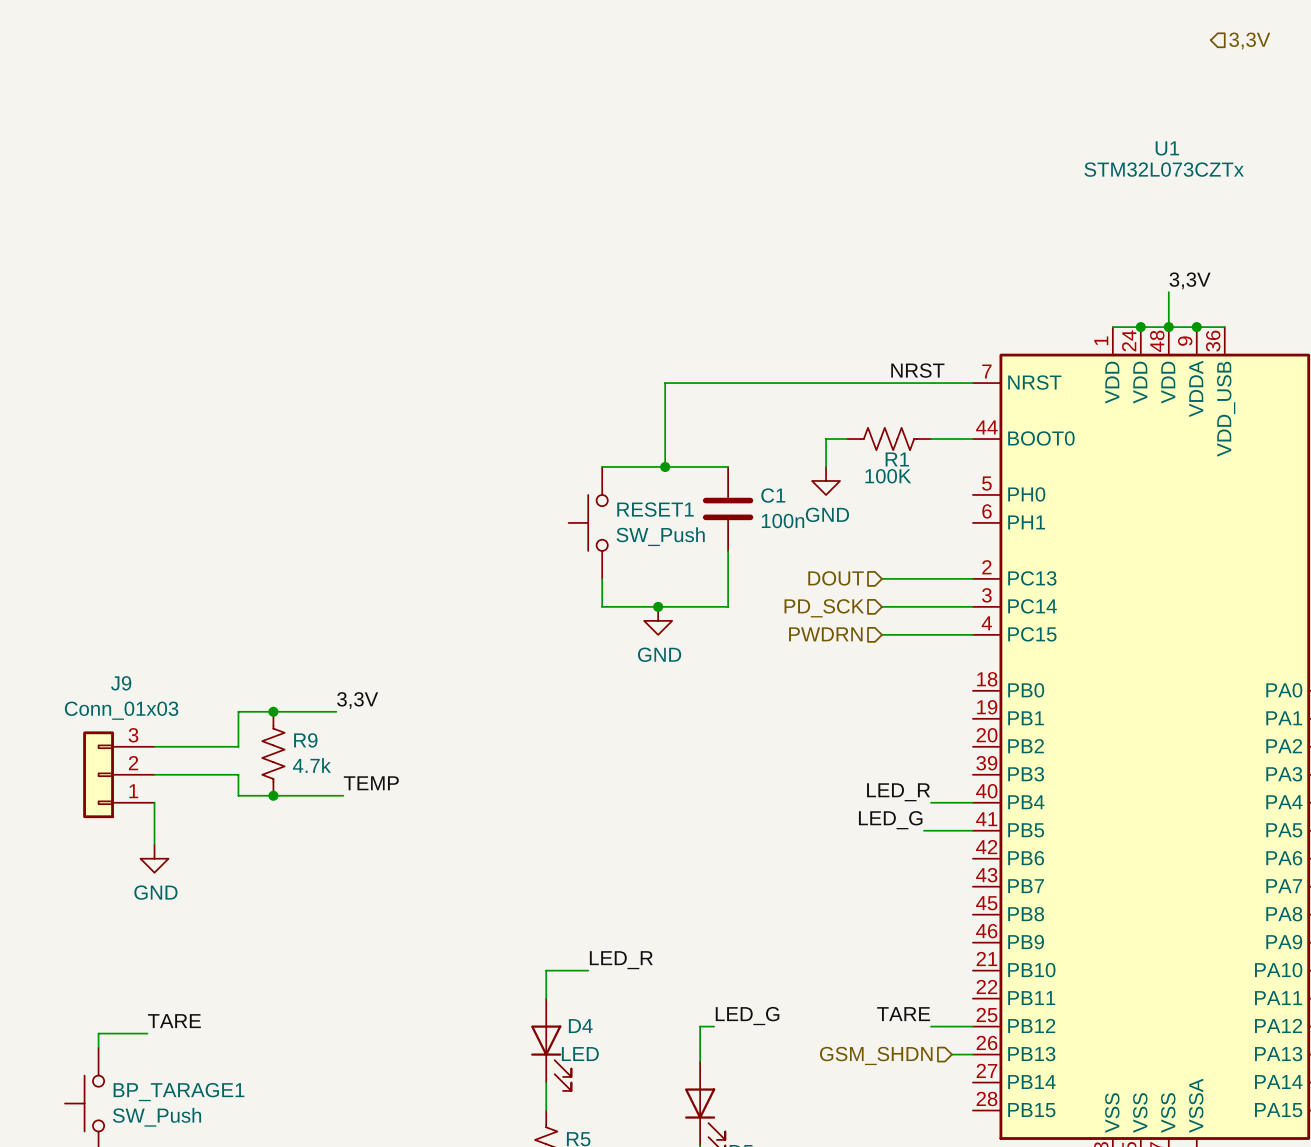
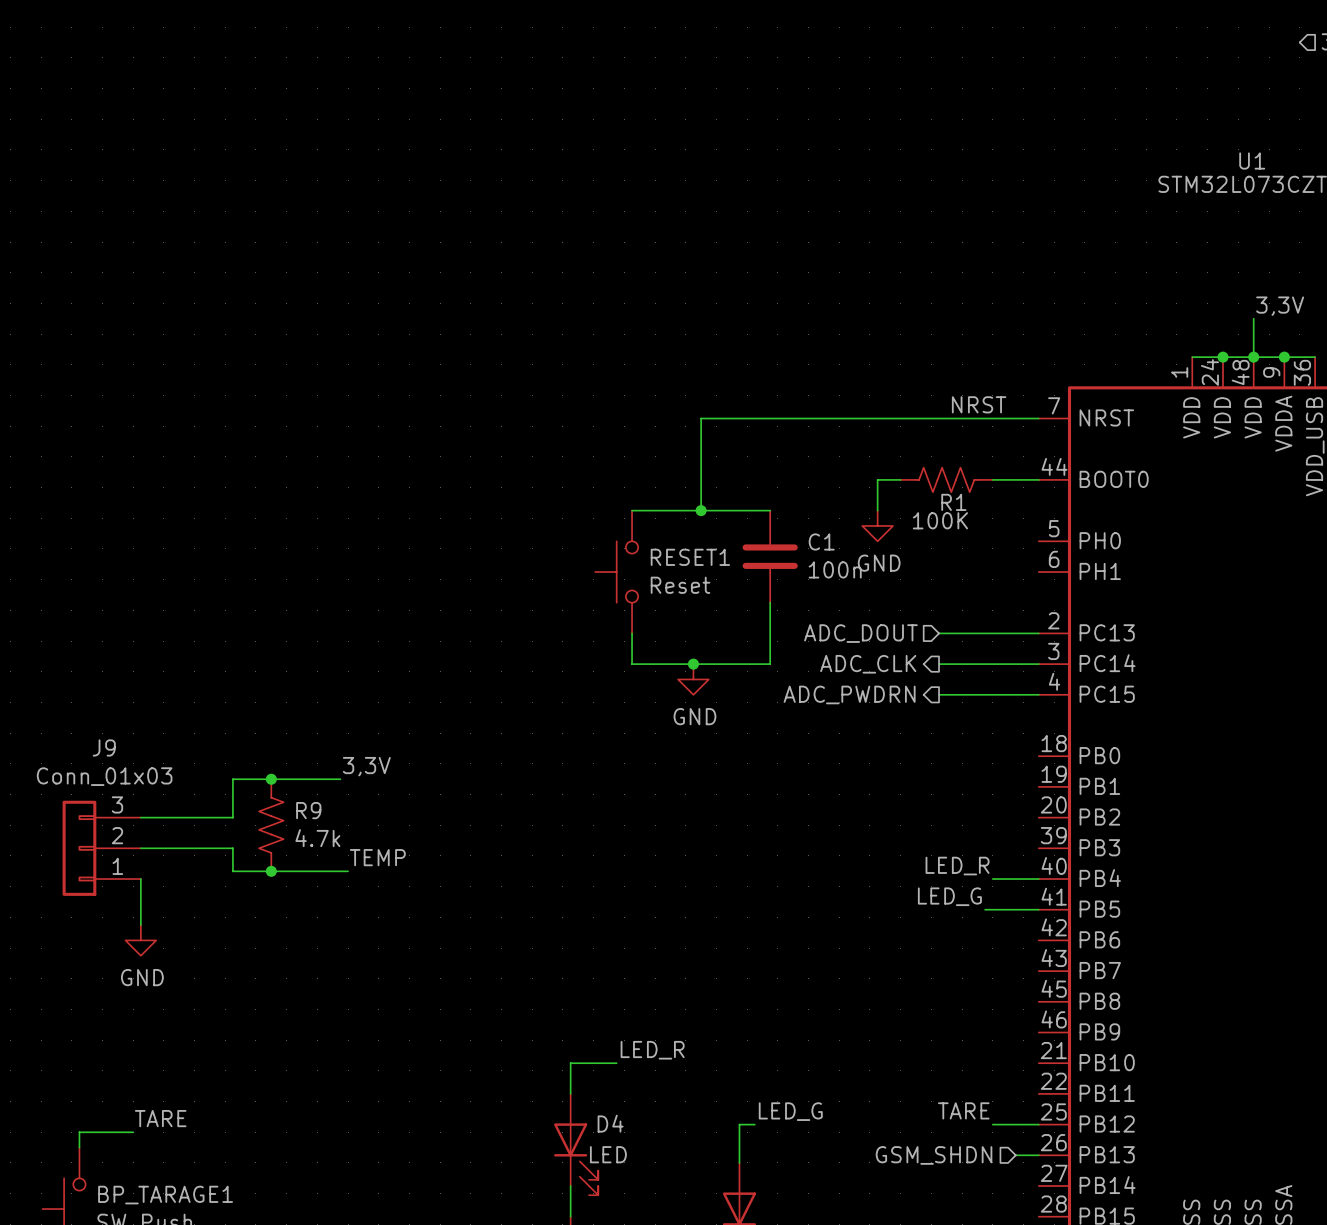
RESET1 value: SW_Push (660, 536) -> Reset (680, 585)
hierarchical label: DOUT (836, 578) -> ADC_DOUT (860, 633)
hierarchical label shape: input (824, 608) -> output (868, 664)
hierarchical label: PD_SCK (824, 608) -> ADC_CLK (868, 664)
hierarchical label shape: input (825, 634) -> output (849, 694)
hierarchical label: PWDRN (825, 634) -> ADC_PWDRN (849, 694)

